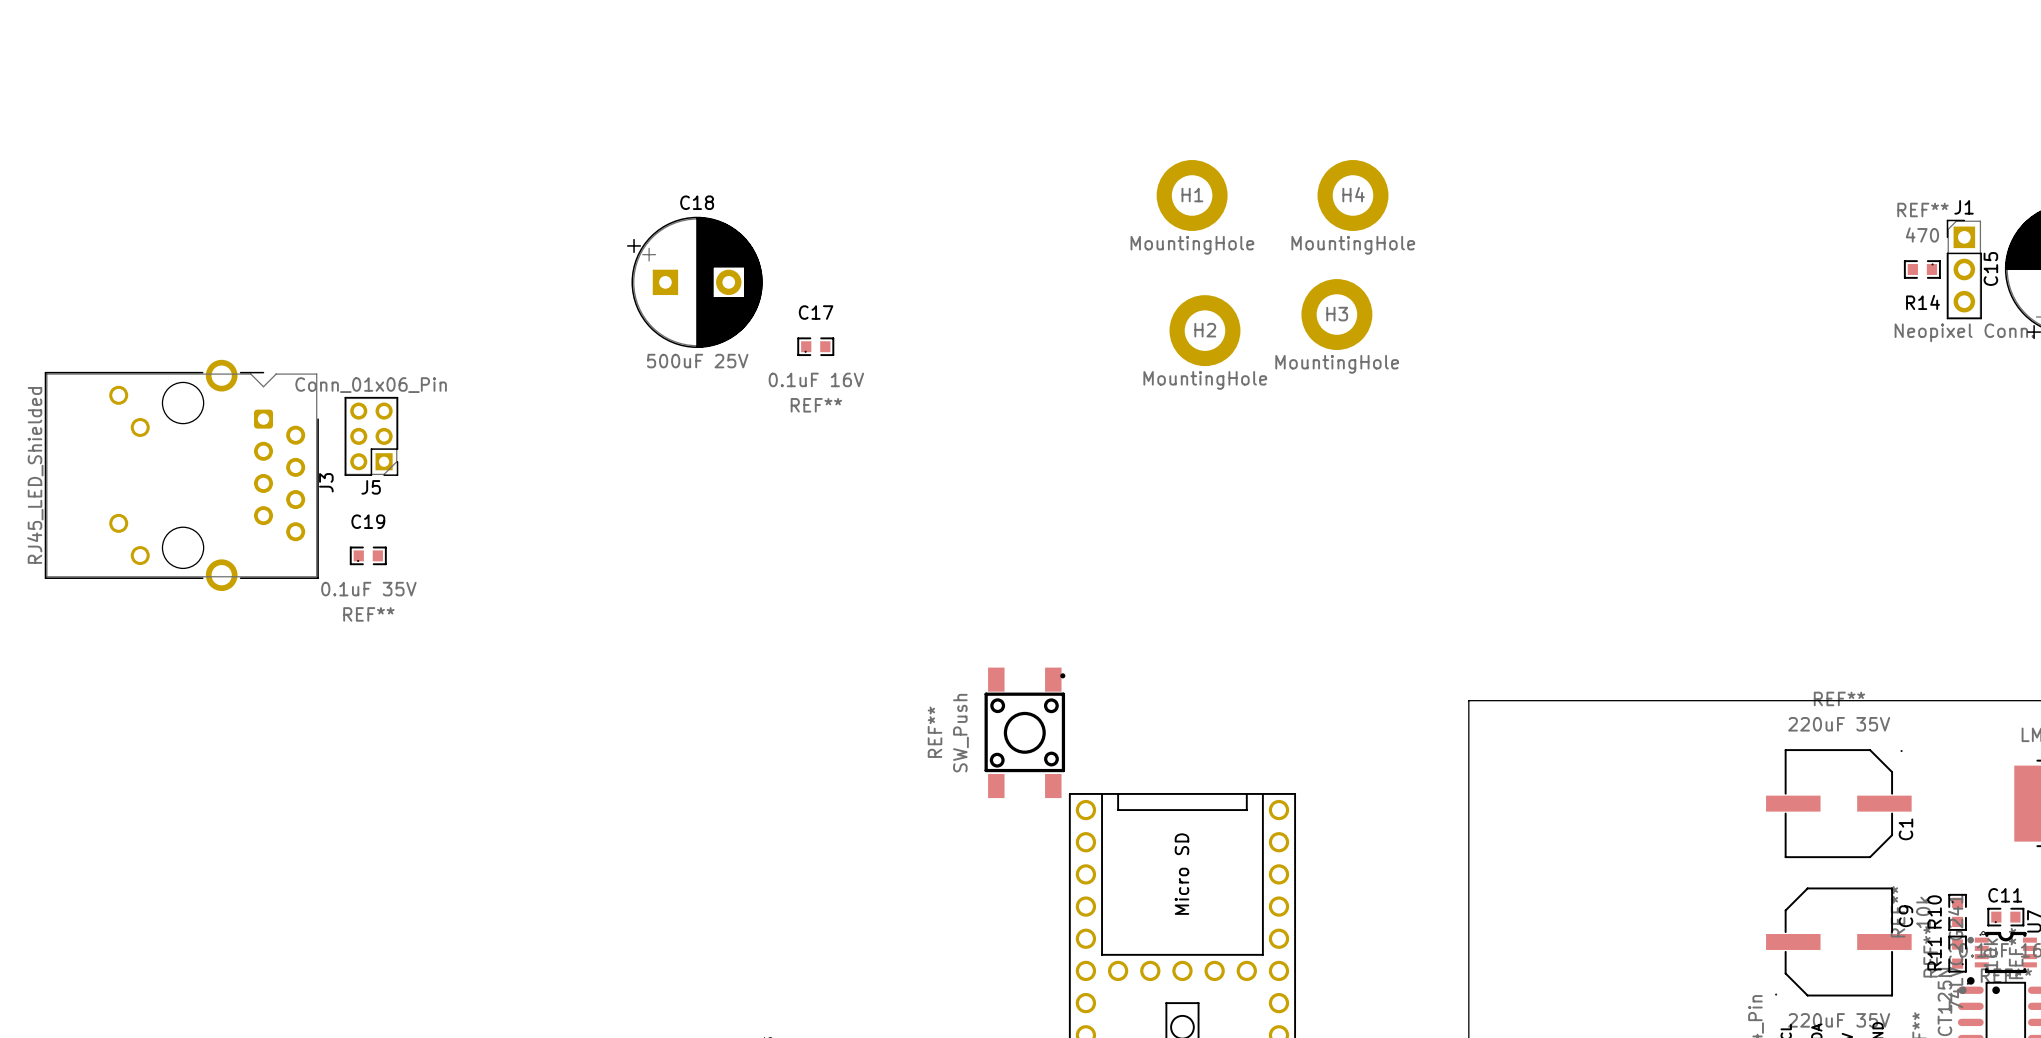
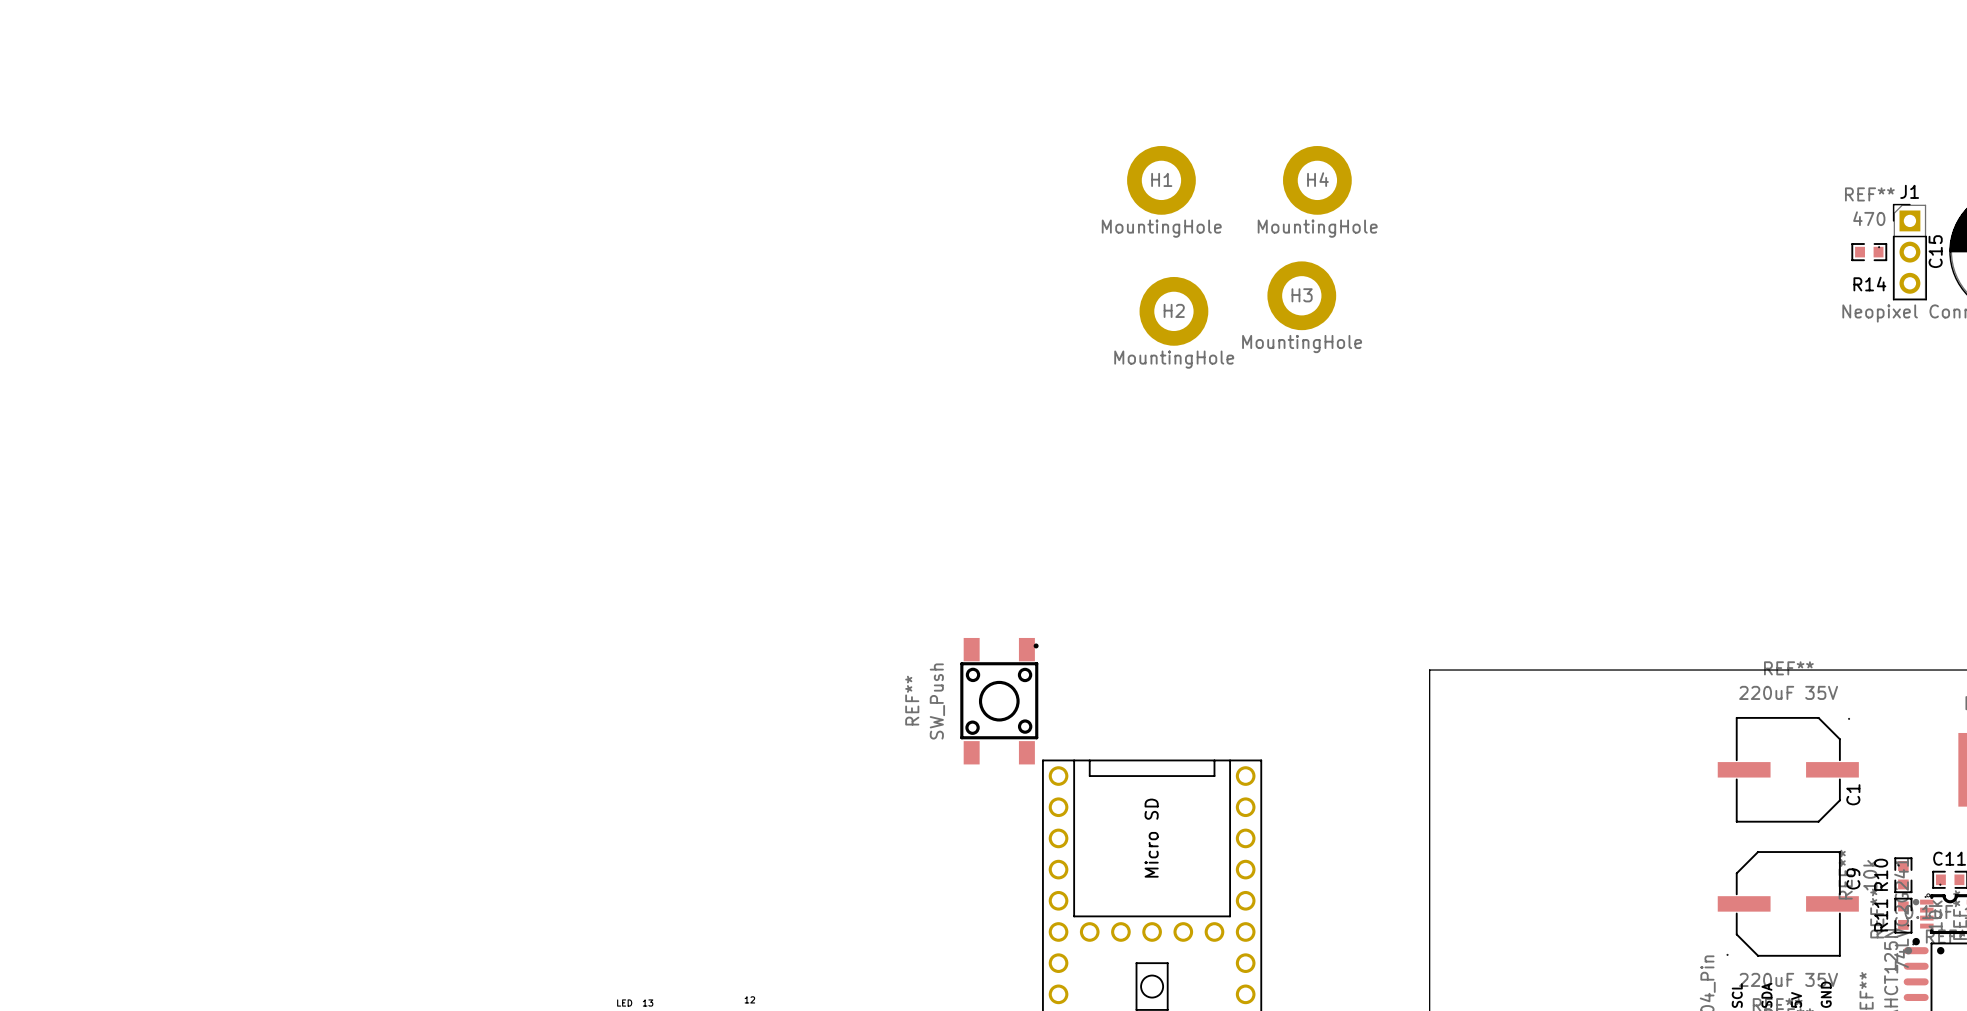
C18: 500uF 25V (694, 282) -> none
C17: 0.1uF 16V (815, 346) -> none
J5: Conn_01x06_Pin (371, 436) -> none
J3: RJ45_LED_Shielded (181, 475) -> none
C19: 0.1uF 35V (368, 555) -> none

